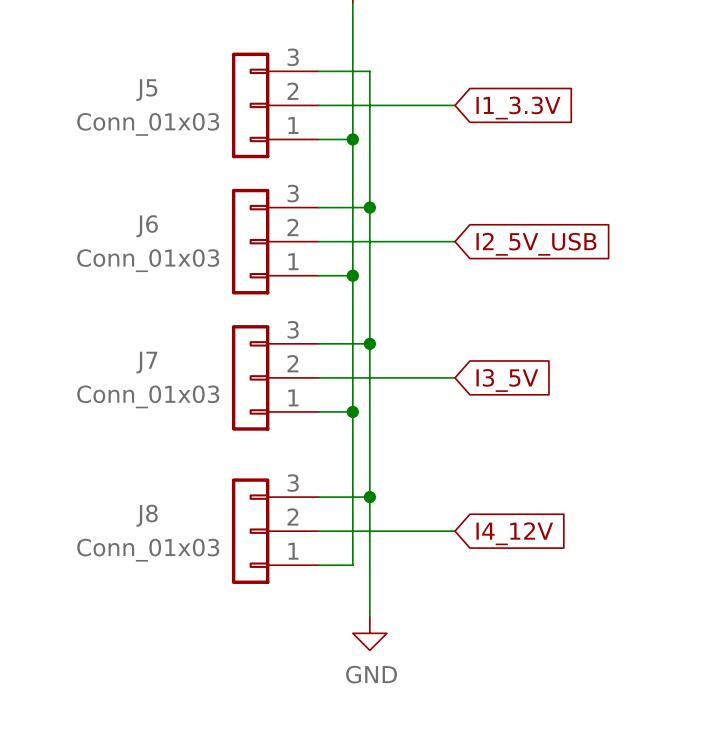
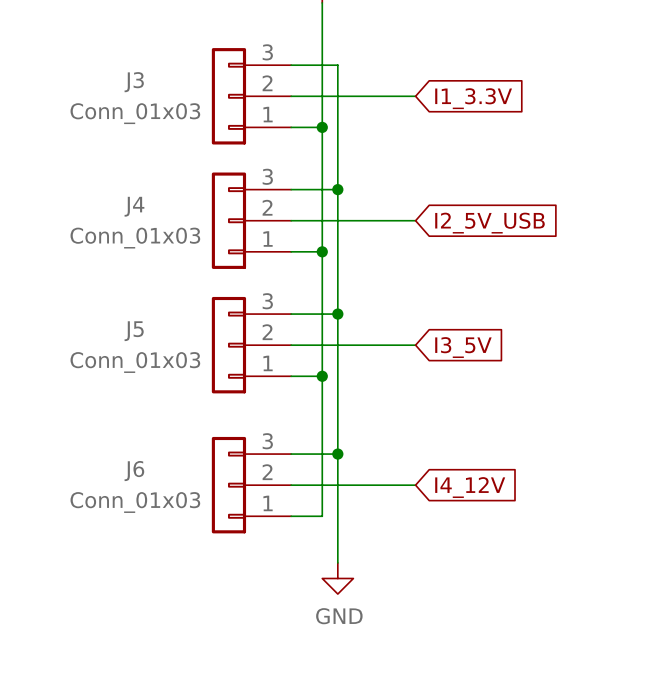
J5 name: J5 (146, 90) -> J3 (134, 82)
J6 name: J6 (147, 226) -> J4 (134, 206)
J7 name: J7 (146, 362) -> J5 (134, 331)
J8 name: J8 (147, 515) -> J6 (134, 471)

